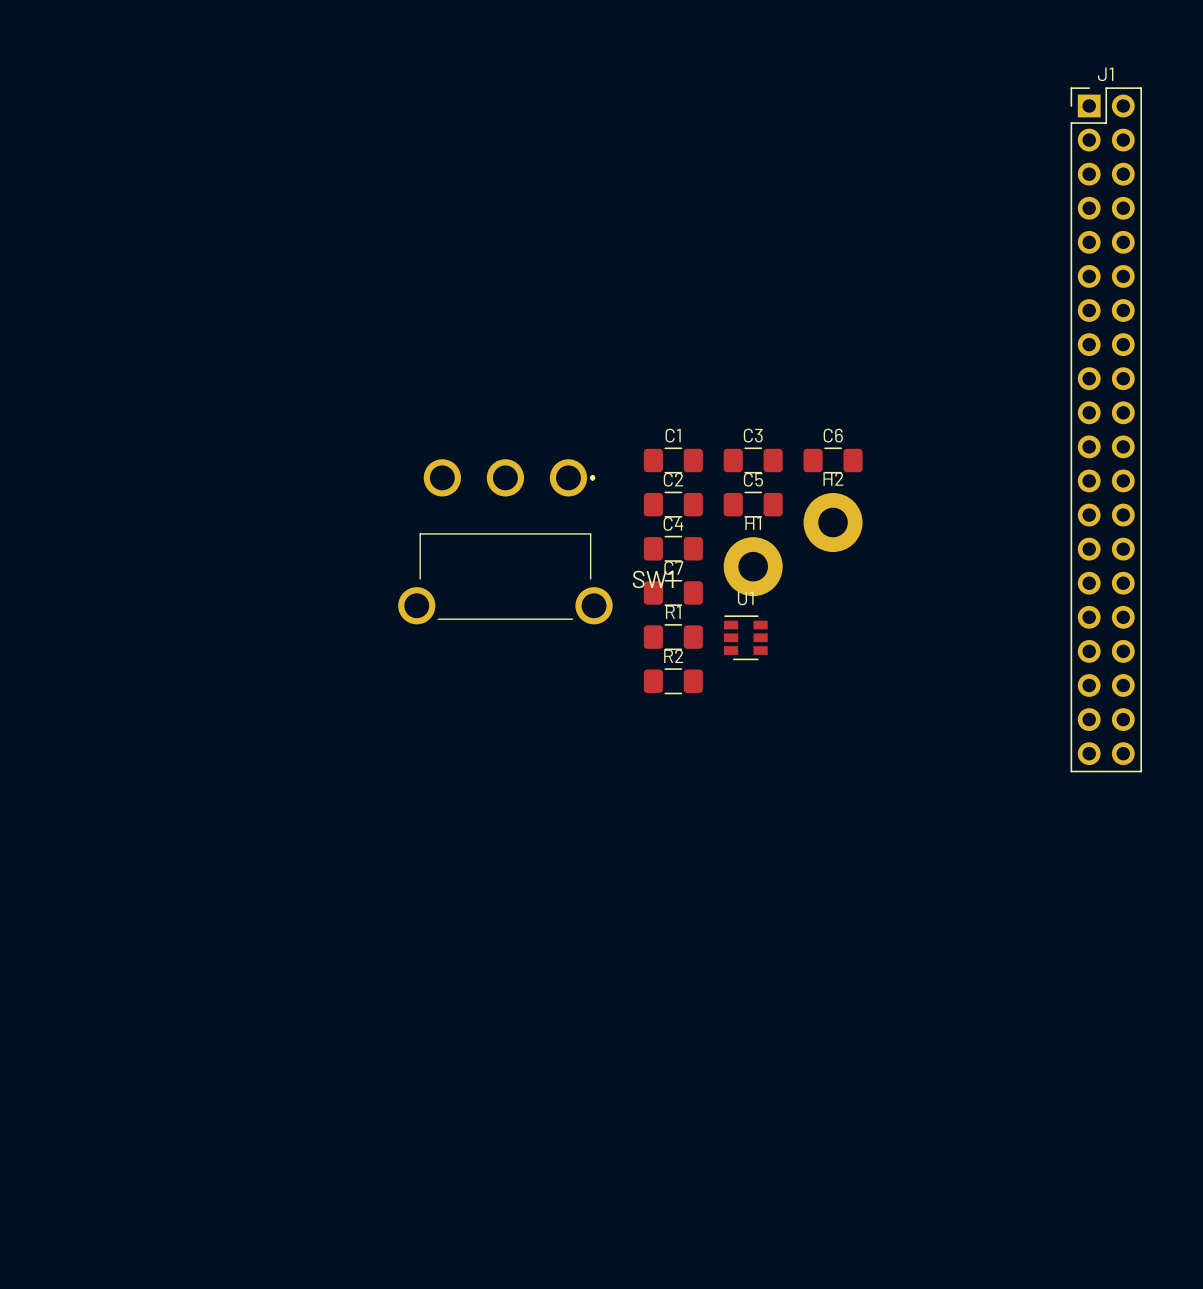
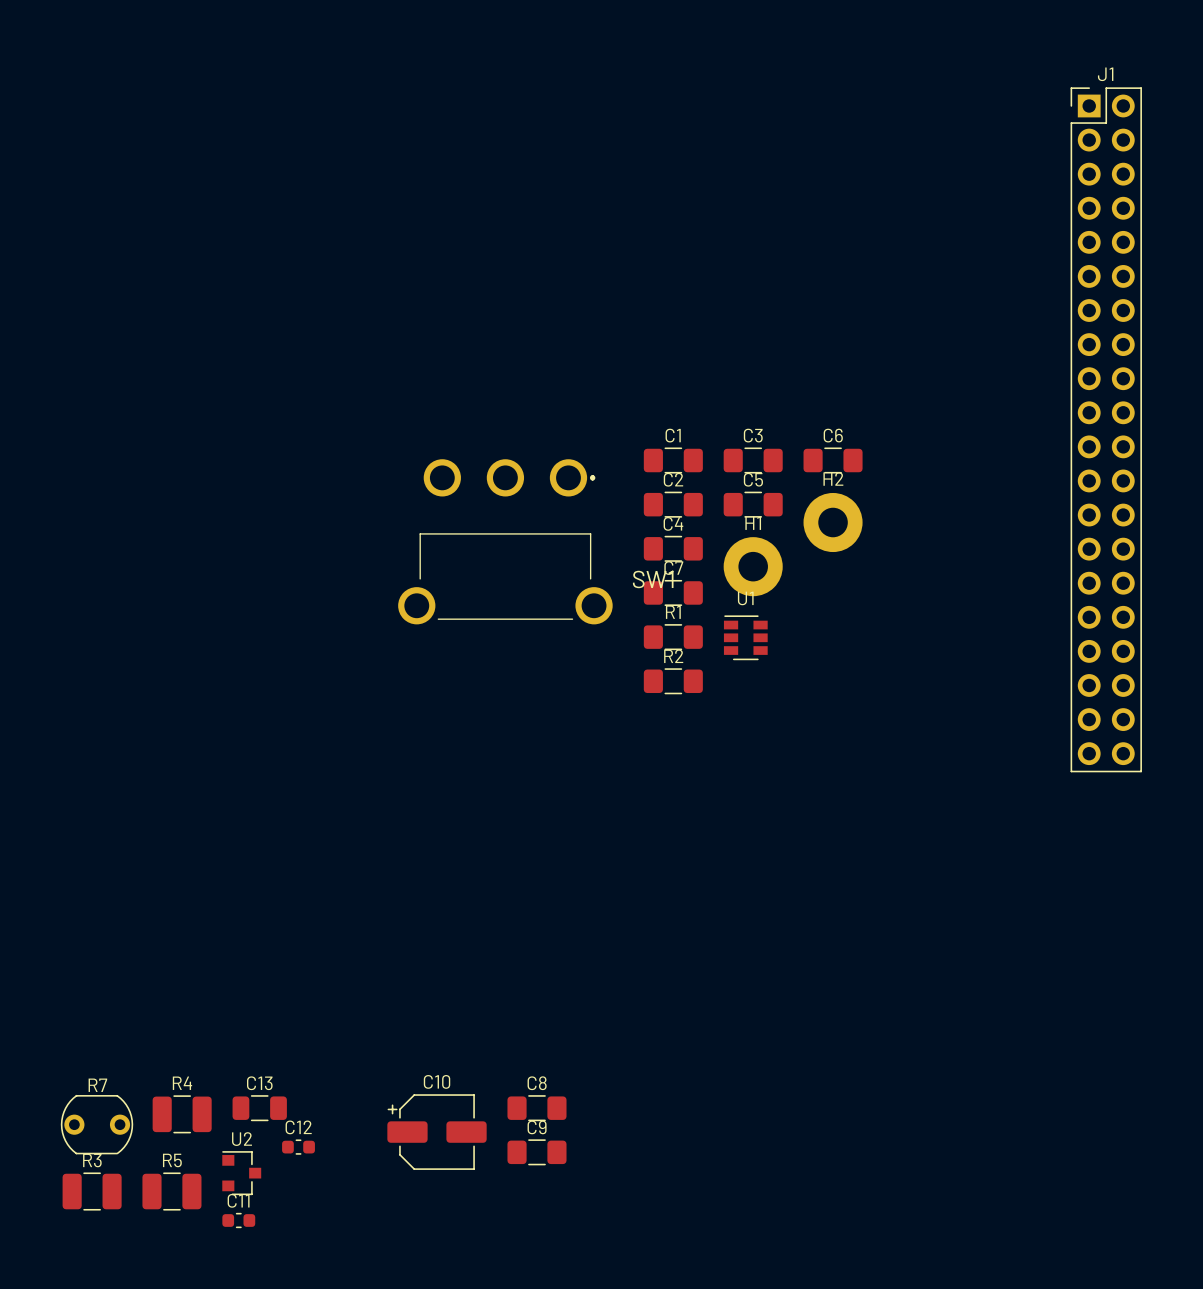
C13: none -> (259, 1108)
C8: none -> (536, 1108)
R4: none -> (182, 1114)
R7: none -> (97, 1124)
C10: none -> (437, 1132)
C12: none -> (298, 1147)
C9: none -> (536, 1152)
U2: none -> (241, 1173)
R3: none -> (92, 1191)
R5: none -> (171, 1191)
C11: none -> (238, 1220)

